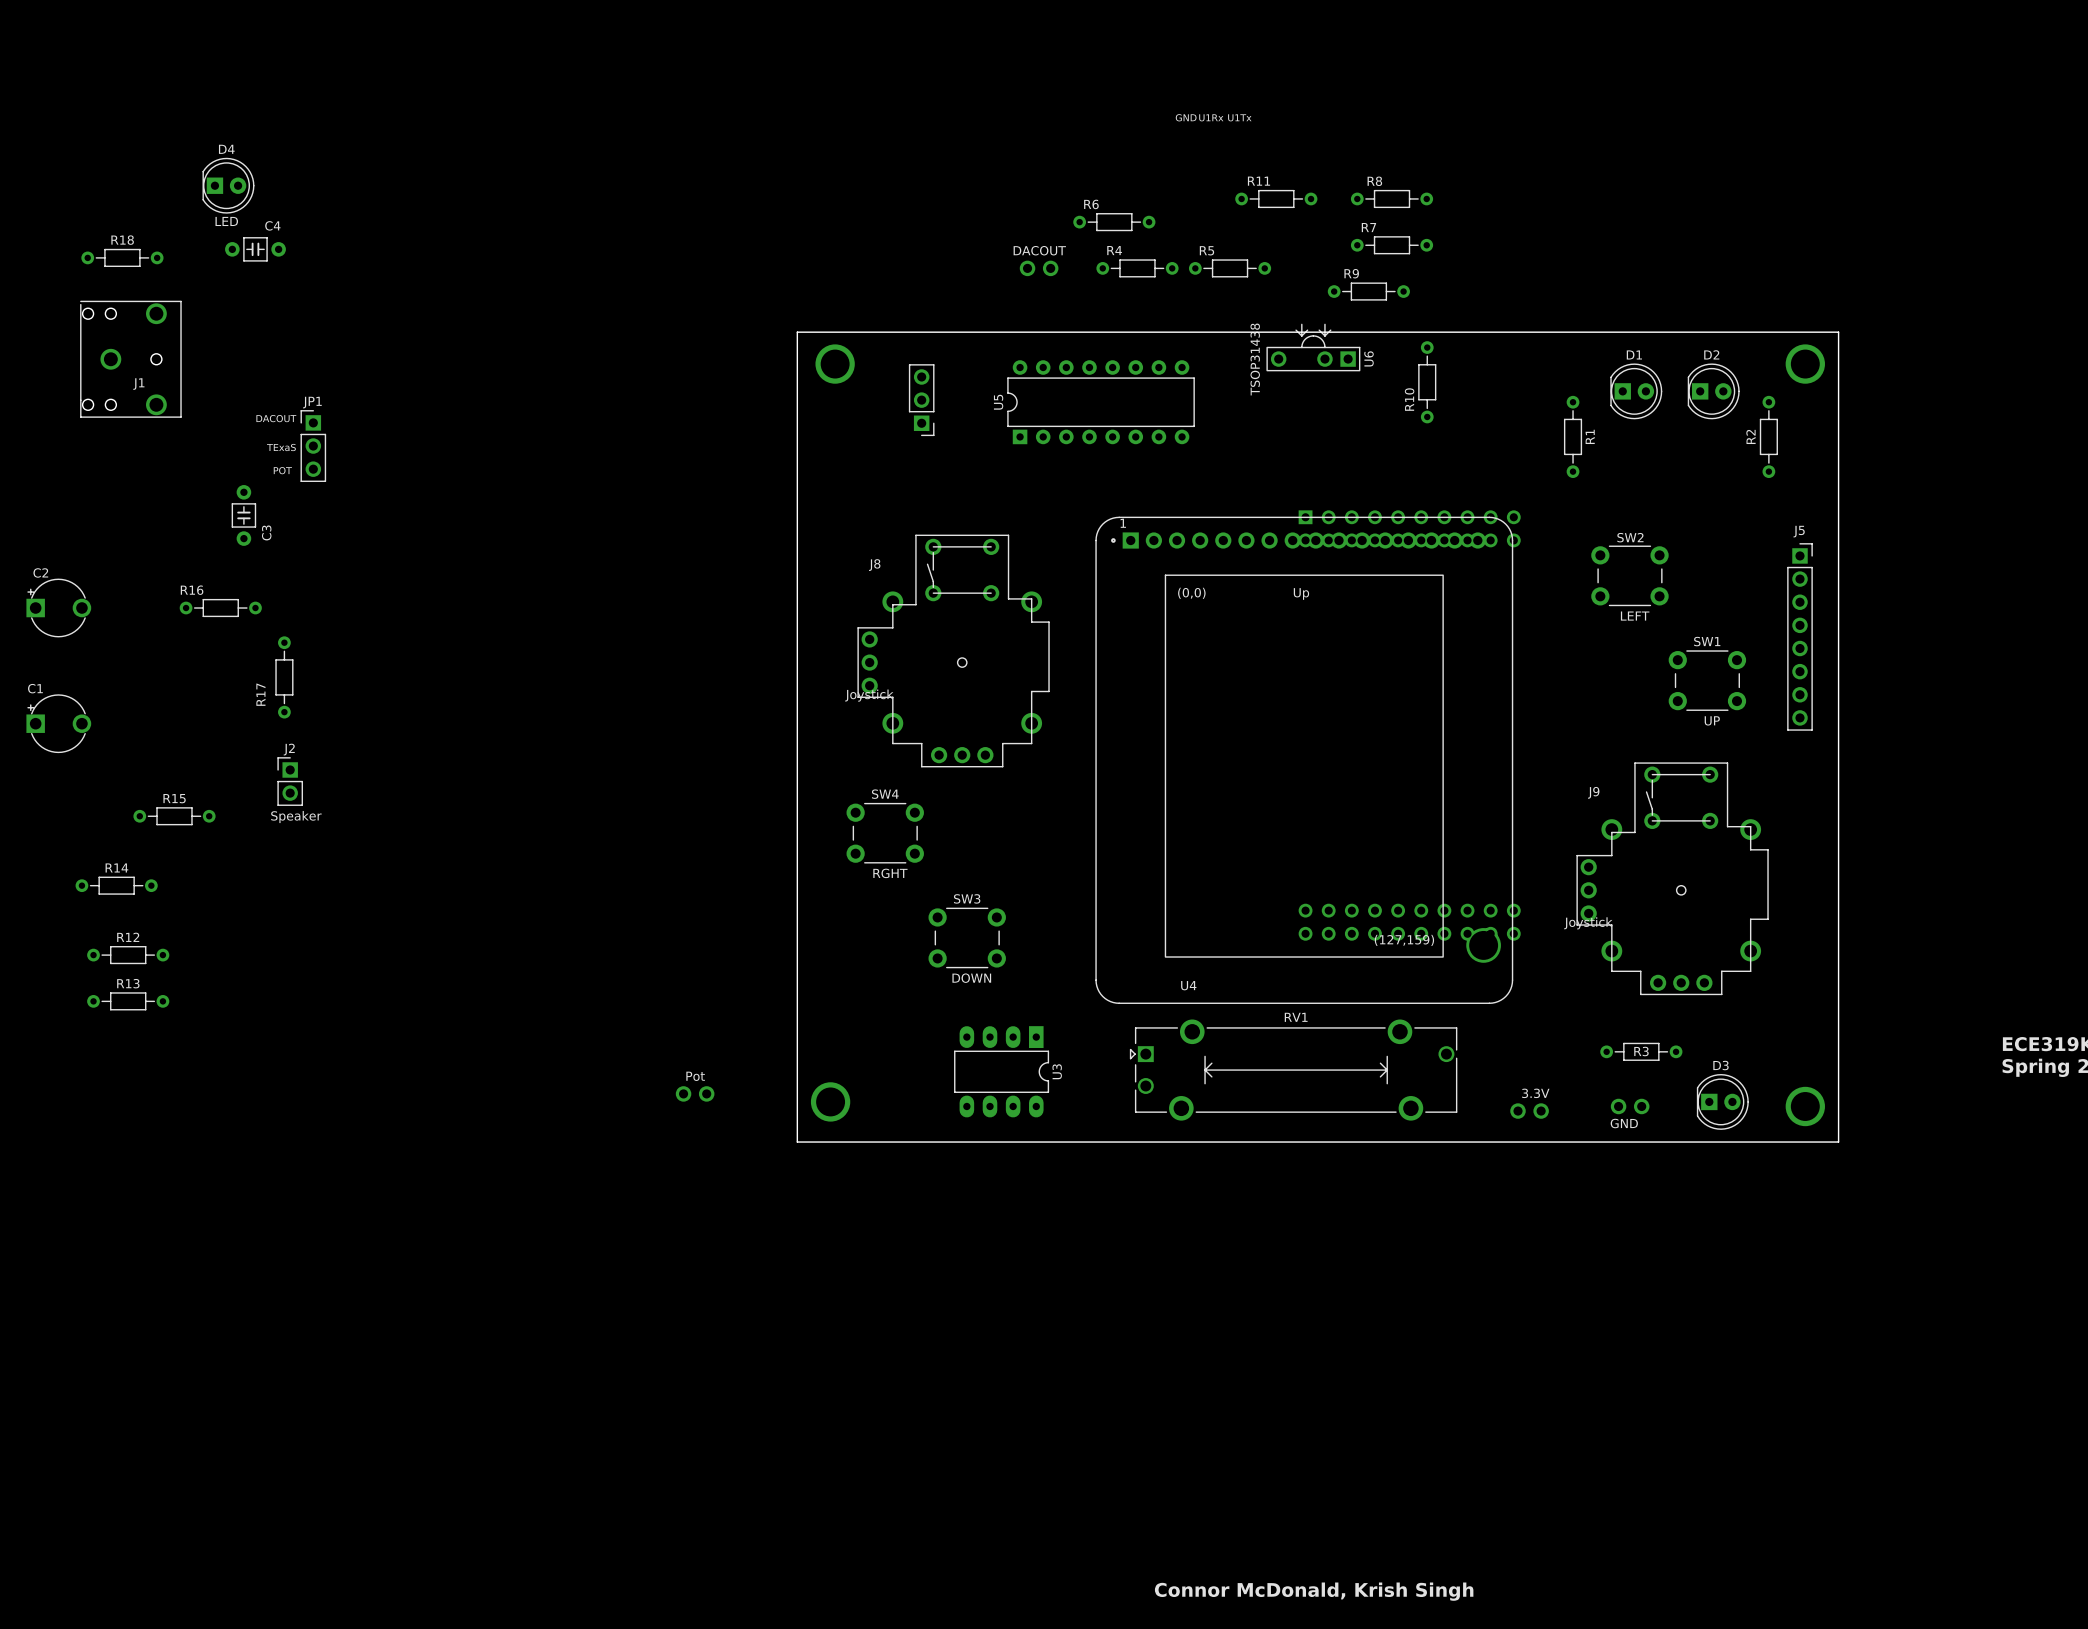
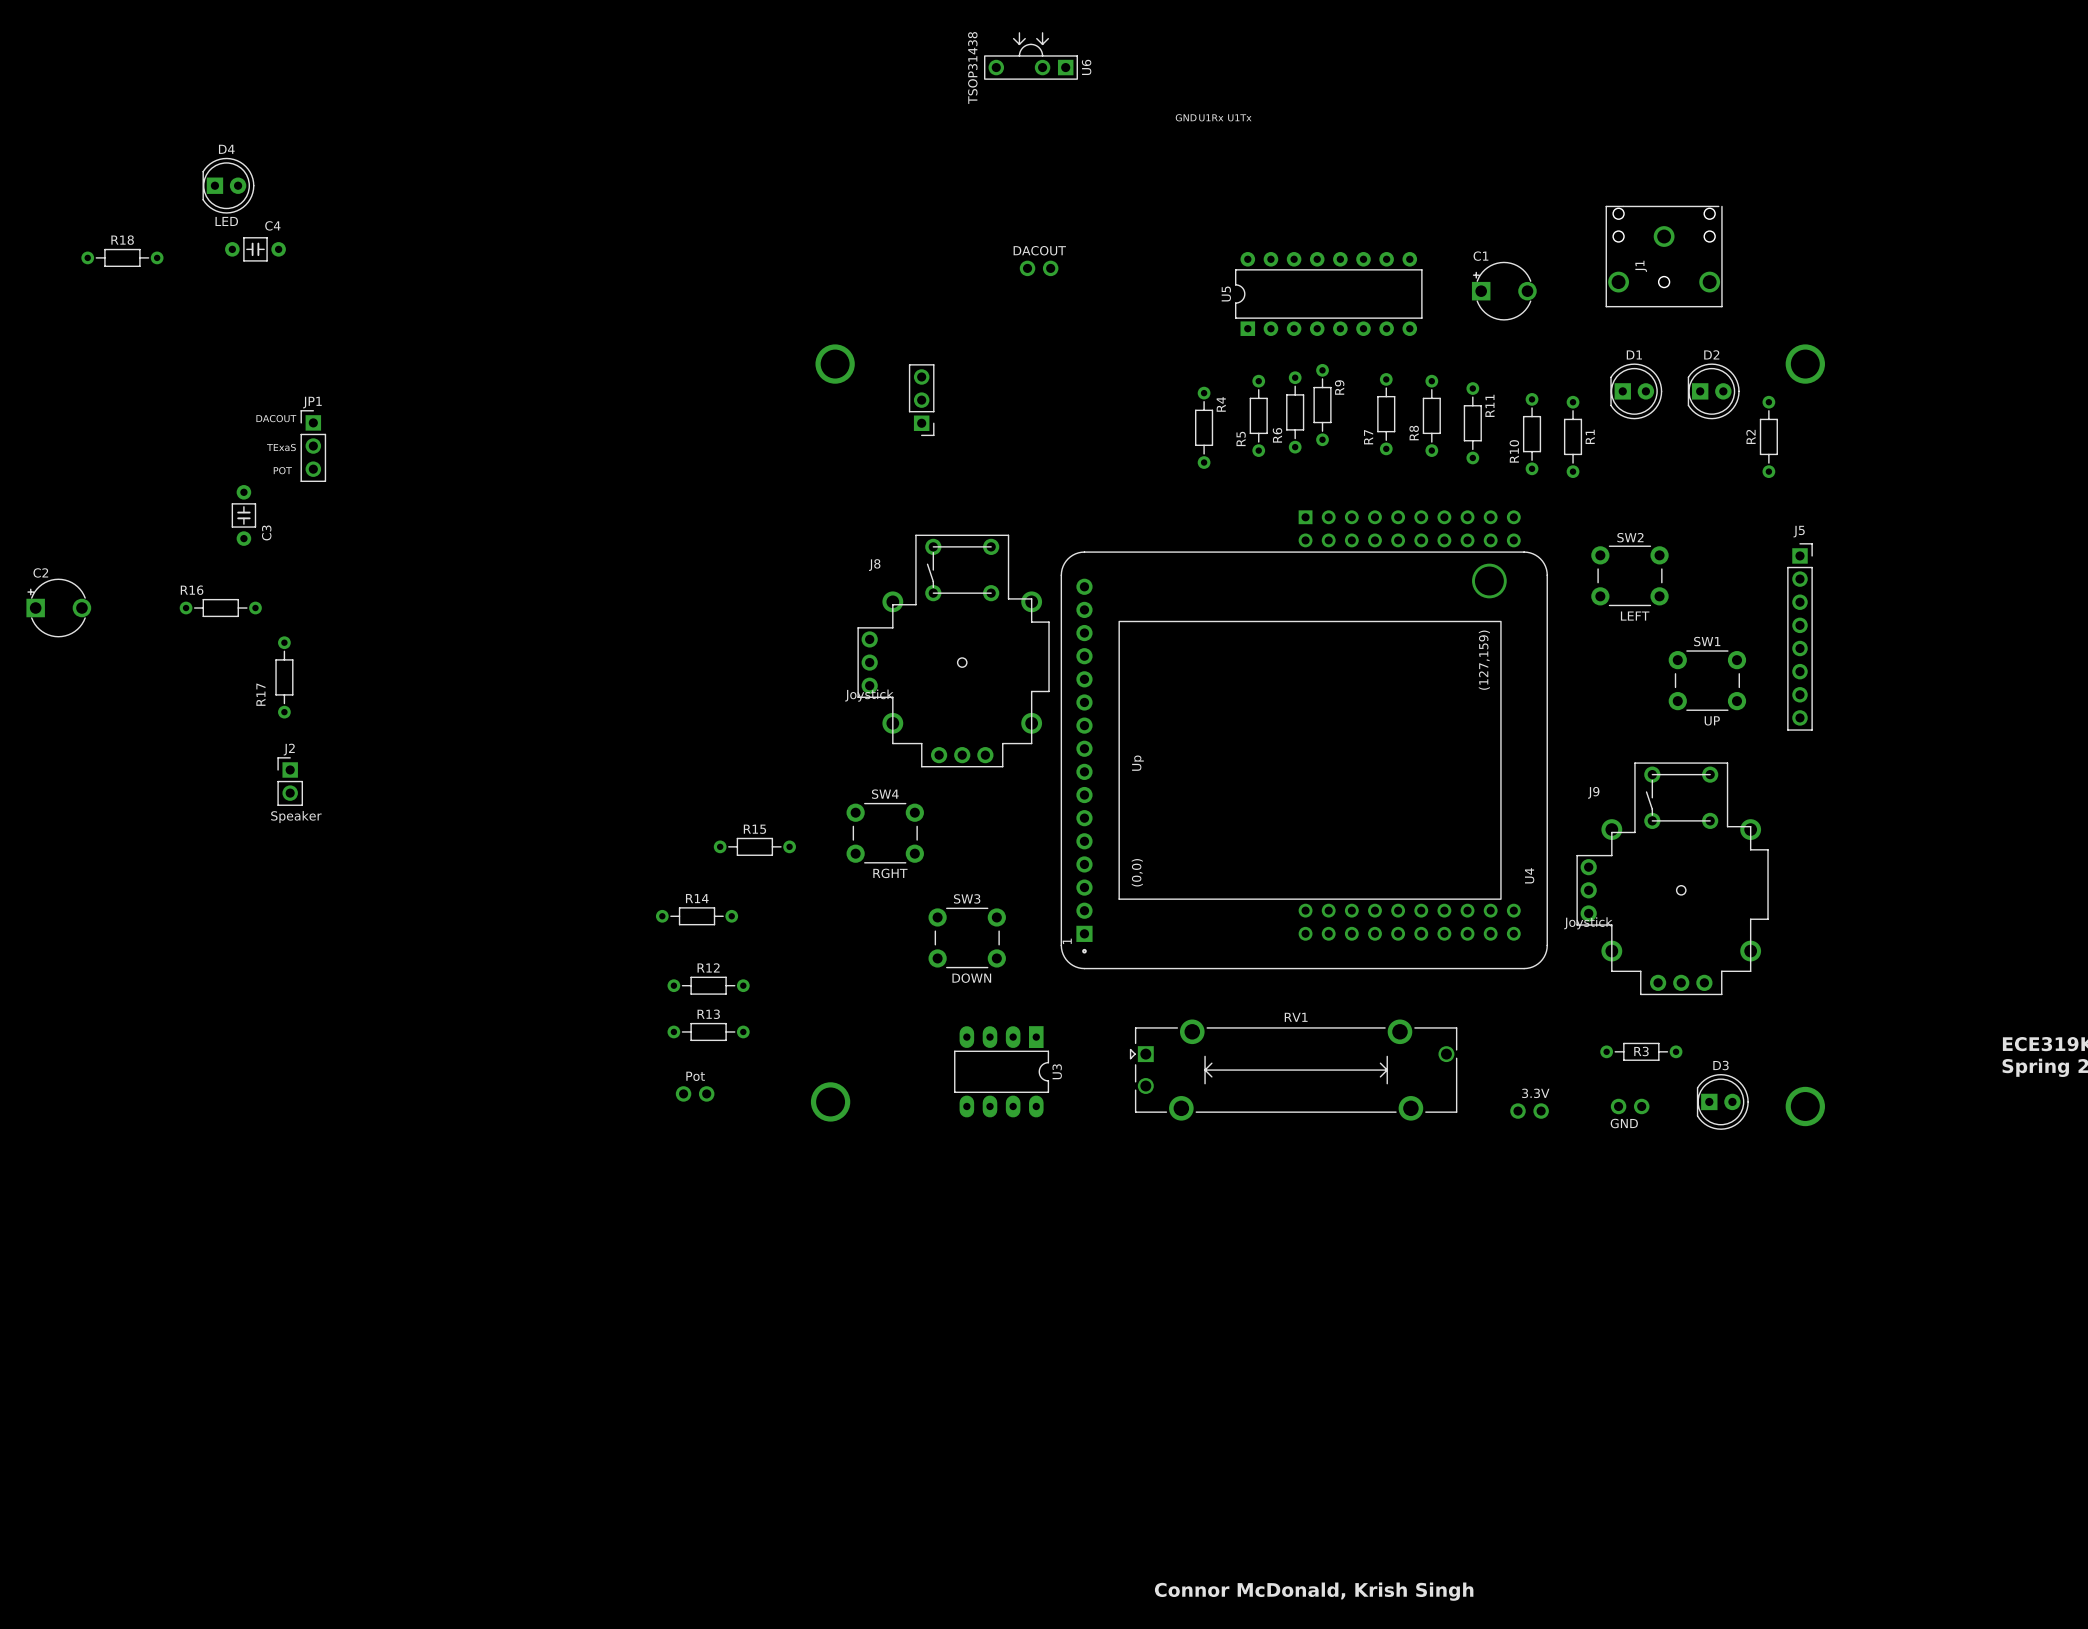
R8 name position: R8 (1374, 181) -> R8 (1414, 433)
R11 rotation: 0° (1276, 198) -> 90° clockwise (1472, 423)
R11 position: (1276, 198) -> (1472, 423)
R8 rotation: 0° (1392, 198) -> 90° clockwise (1431, 415)
R8 position: (1392, 198) -> (1431, 415)
R6 name position: R6 (1091, 204) -> R6 (1277, 435)
R6 rotation: 0° (1114, 222) -> 90° clockwise (1295, 412)
R6 position: (1114, 222) -> (1295, 412)
R7 name position: R7 (1368, 227) -> R7 (1368, 437)
R7 rotation: 0° (1392, 245) -> 90° clockwise (1386, 414)
R7 position: (1392, 245) -> (1386, 414)
R5 name position: R5 (1206, 250) -> R5 (1241, 438)
R4 rotation: 0° (1137, 268) -> 90° clockwise (1204, 427)
R4 position: (1137, 268) -> (1204, 427)
R5 rotation: 0° (1230, 268) -> 90° clockwise (1258, 415)
R5 position: (1230, 268) -> (1258, 415)
R9 rotation: 0° (1368, 291) -> 90° clockwise (1322, 405)
R9 position: (1368, 291) -> (1322, 405)
board edge: (797, 332) (1838, 332) (1838, 1142) (797, 1142) (797, 332) -> none
U6 position: (1313, 347) -> (1030, 55)
J1 rotation: 0° (130, 359) -> 90° clockwise (1664, 256)
J1 position: (130, 359) -> (1664, 256)
R10 position: (1427, 382) -> (1532, 434)
U5 position: (1101, 402) -> (1328, 293)
C1 position: (58, 723) -> (1504, 291)
U4 rotation: 0° (1304, 760) -> 90° counterclockwise (1304, 760)
R15 position: (174, 816) -> (754, 846)
R14 position: (116, 885) -> (697, 916)
R12 position: (128, 955) -> (708, 985)
R13 position: (128, 1001) -> (708, 1031)

